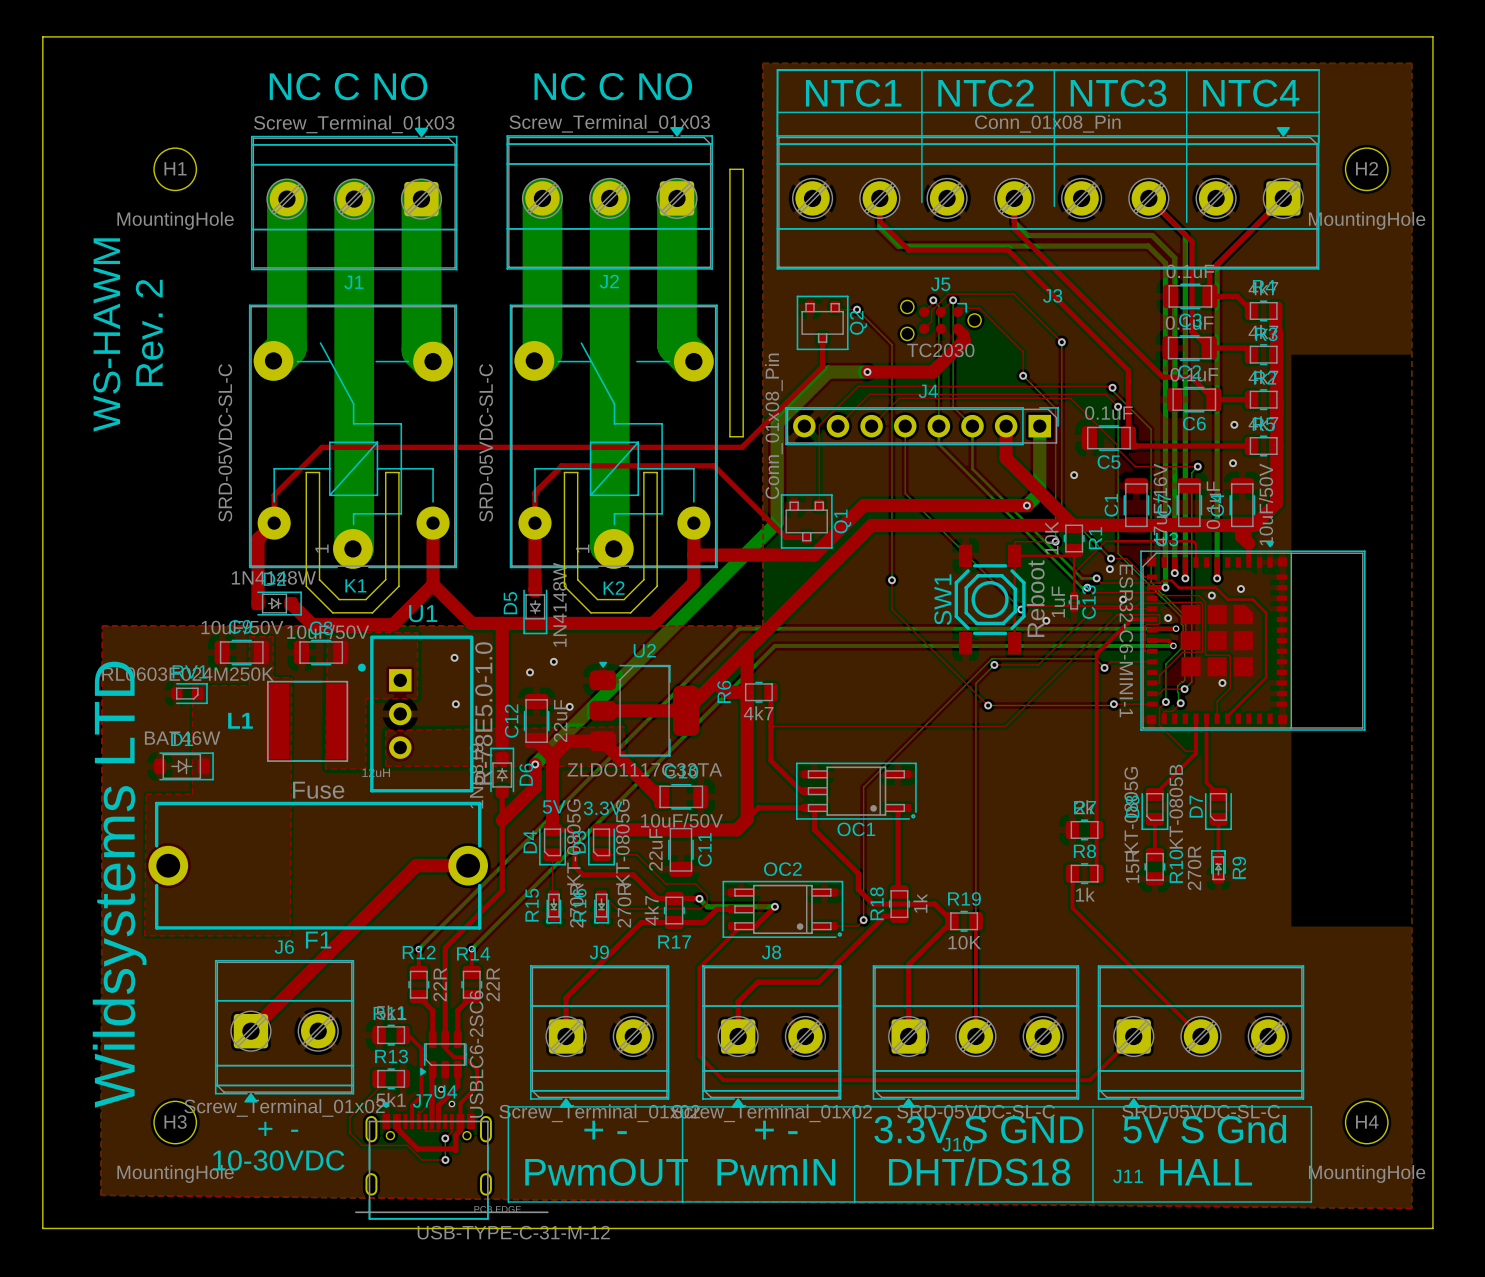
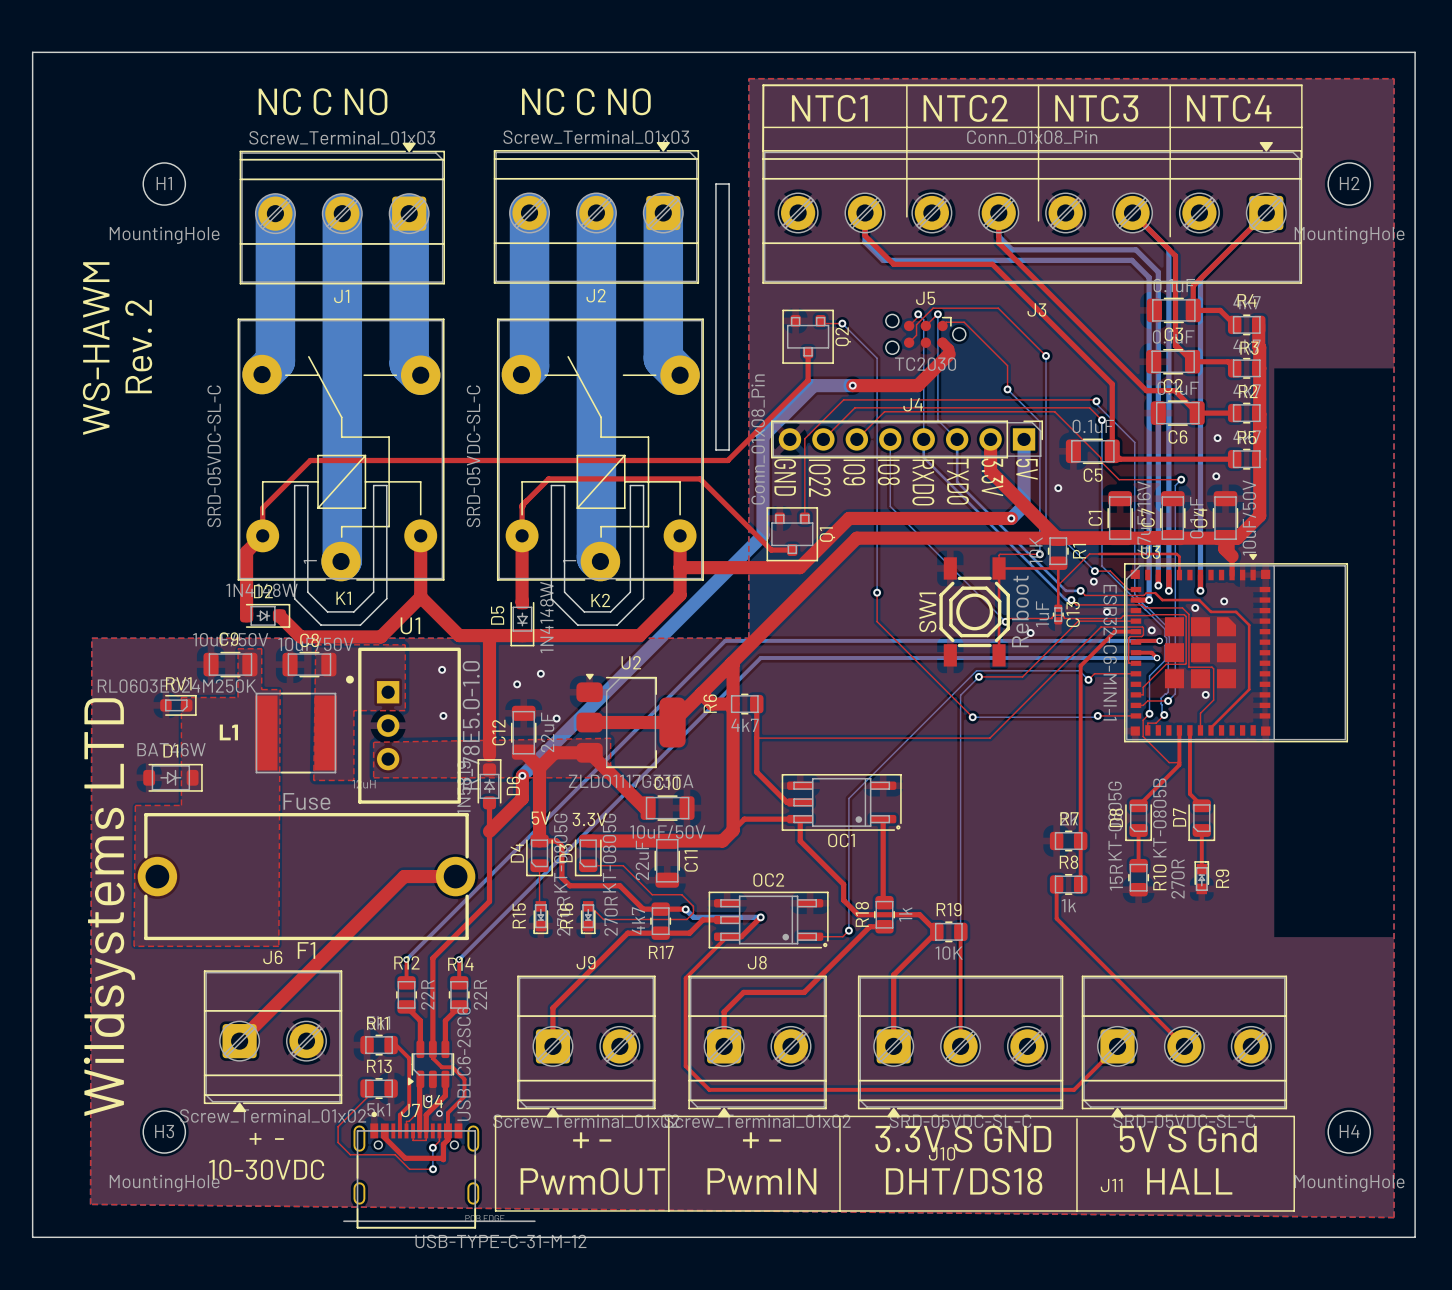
text: none -> 5V (1026, 469)
text: none -> IO9 (854, 472)
text: none -> IO8 (888, 472)
text: none -> 3.3V (992, 477)
text: none -> GND (785, 477)
text: none -> IO22 (819, 478)
text: none -> TXD0 (957, 481)
text: none -> RXD0 (923, 482)

